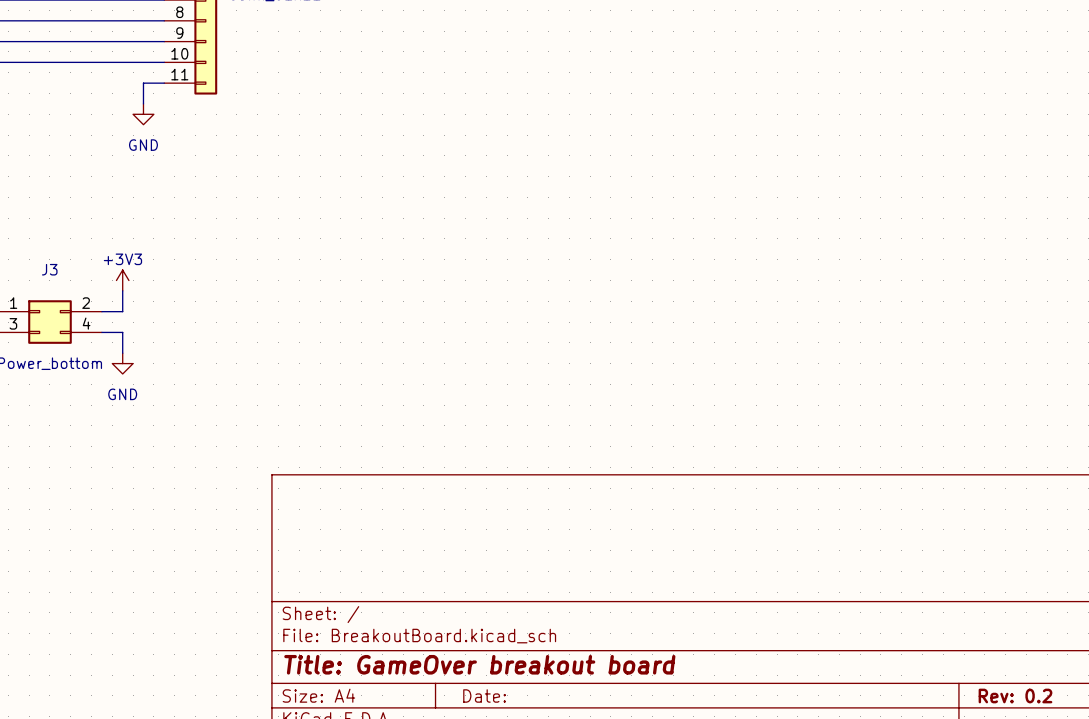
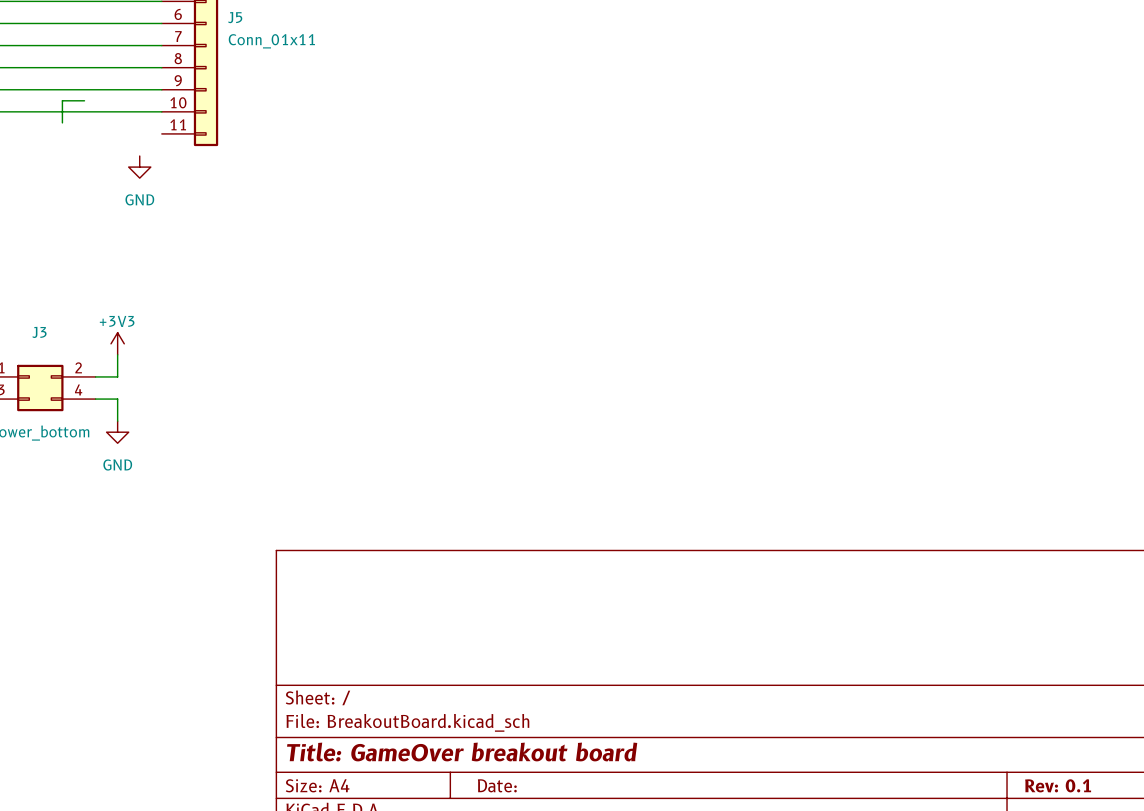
wire: (164, 83) (143, 83) (143, 103) -> (84, 100) (62, 100) (62, 122)
title block: Rev: 0.2 (1015, 696) -> Rev: 0.1 (1058, 785)

